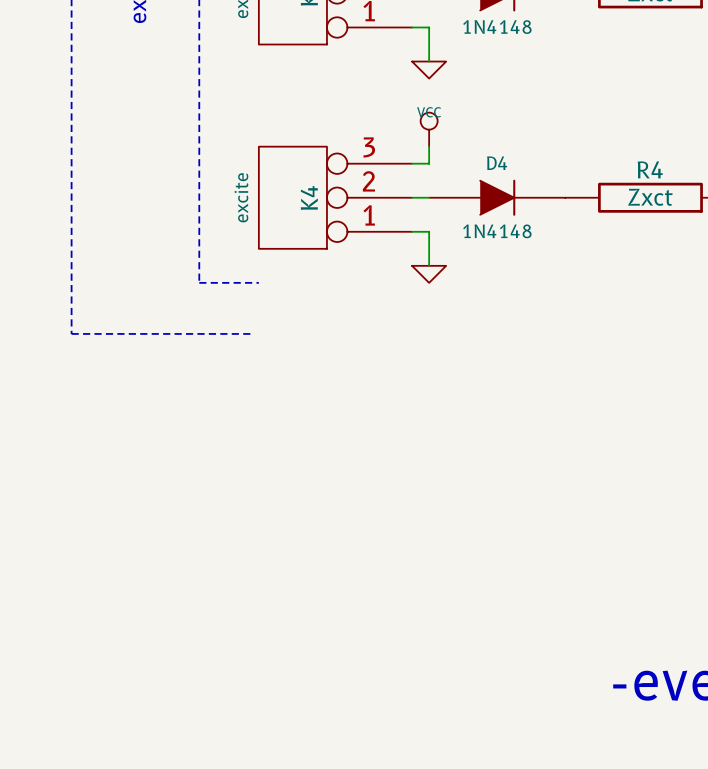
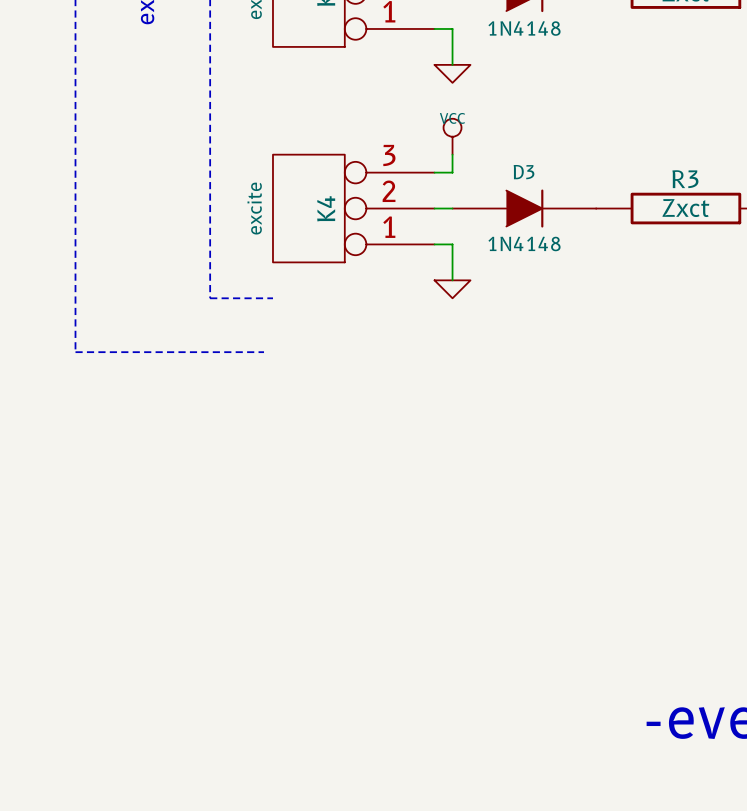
D4 name: D4 (497, 163) -> D3 (524, 172)
R4 name: R4 (650, 169) -> R3 (685, 179)

